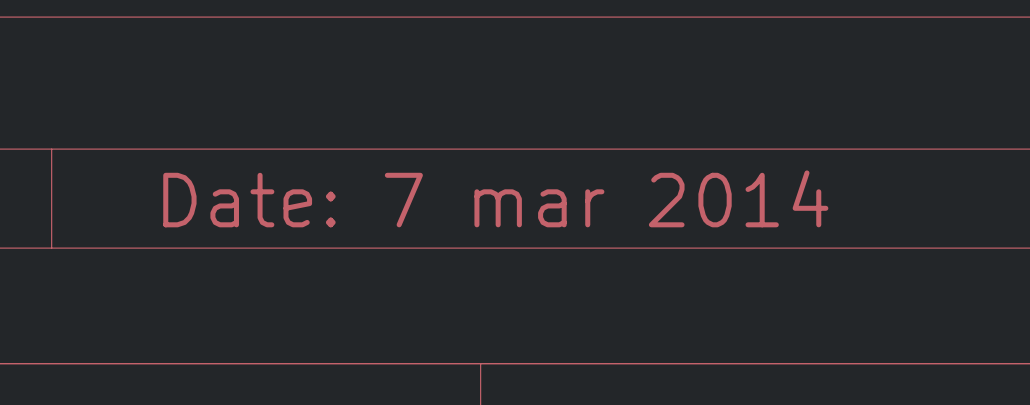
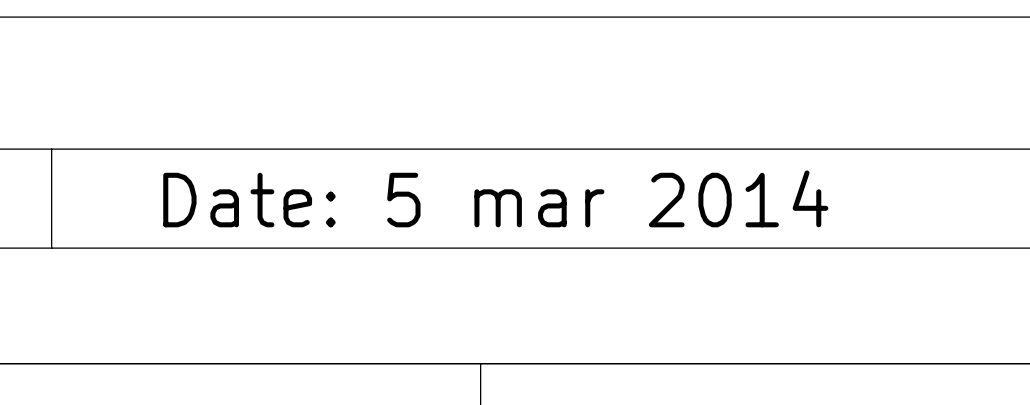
title block: Date: 7 mar 2014 (495, 198) -> Date: 5 mar 2014 (495, 198)

